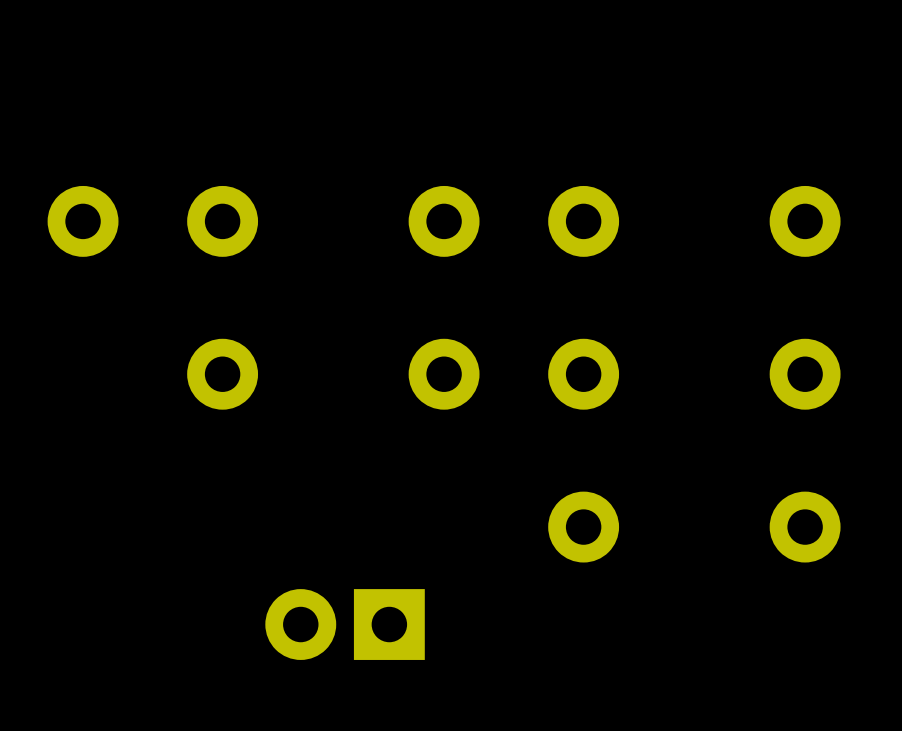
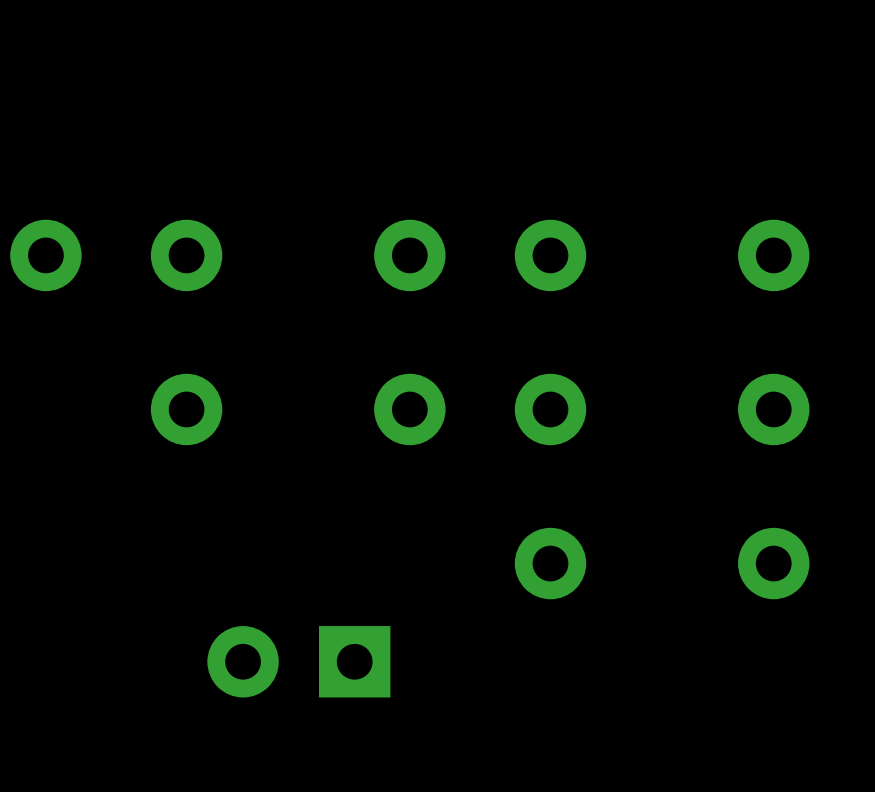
part footprint: [265, 589, 425, 660] -> [207, 626, 391, 698]

